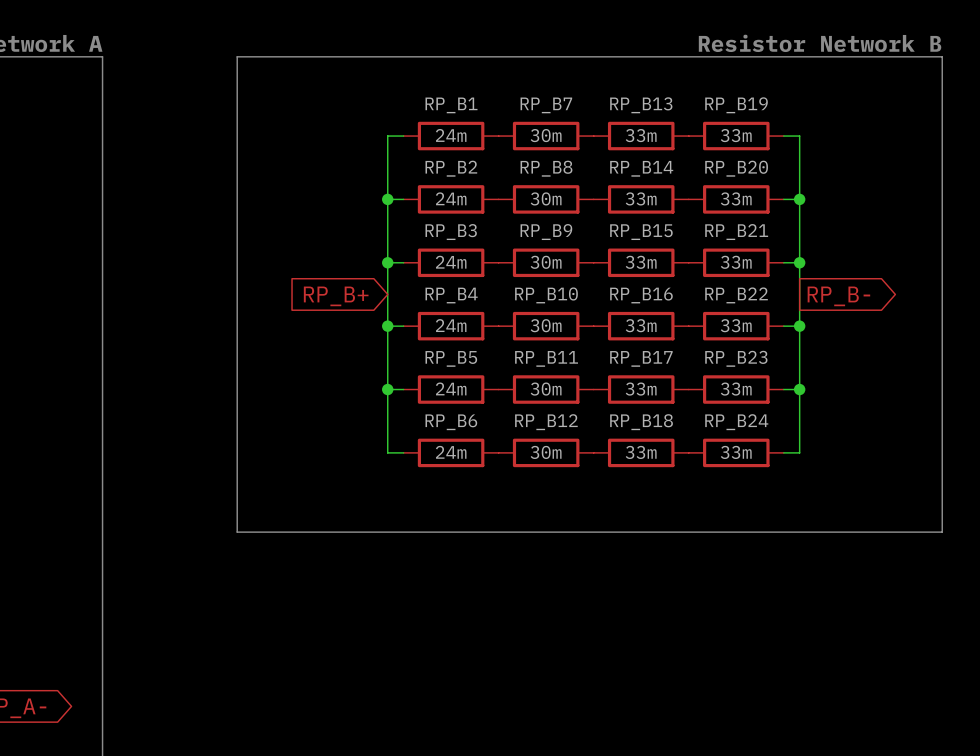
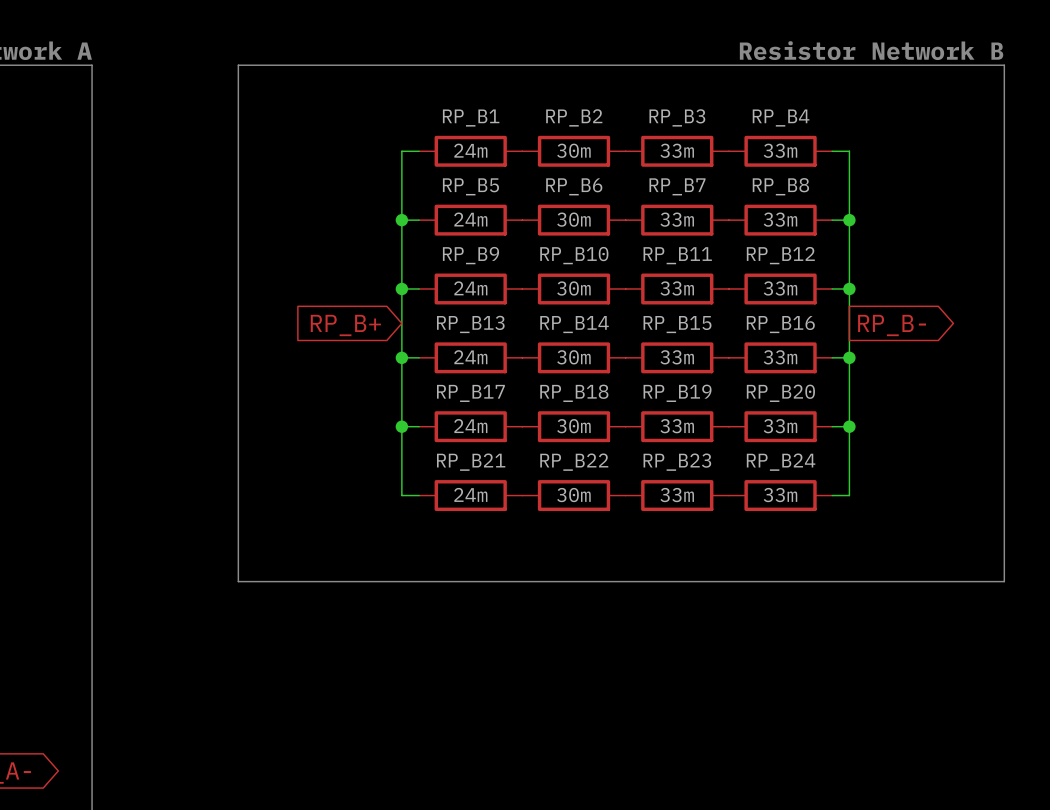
RP_B7 name: RP_B7 (546, 105) -> RP_B2 (574, 117)
RP_B13 name: RP_B13 (641, 105) -> RP_B3 (677, 117)
RP_B19 name: RP_B19 (736, 105) -> RP_B4 (781, 118)
RP_B2 name: RP_B2 (451, 168) -> RP_B5 (470, 186)
RP_B8 name: RP_B8 (546, 168) -> RP_B6 (574, 186)
RP_B14 name: RP_B14 (641, 168) -> RP_B7 (677, 186)
RP_B20 name: RP_B20 (736, 168) -> RP_B8 (780, 186)
RP_B3 name: RP_B3 (451, 232) -> RP_B9 (470, 255)
RP_B9 name: RP_B9 (546, 232) -> RP_B10 (574, 255)
RP_B15 name: RP_B15 (641, 232) -> RP_B11 (677, 255)
RP_B21 name: RP_B21 (736, 232) -> RP_B12 (780, 255)
RP_B4 name: RP_B4 (451, 295) -> RP_B13 (470, 324)
RP_B10 name: RP_B10 (546, 295) -> RP_B14 (574, 324)
RP_B16 name: RP_B16 (641, 295) -> RP_B15 (677, 324)
RP_B22 name: RP_B22 (736, 295) -> RP_B16 (780, 324)
RP_B5 name: RP_B5 (451, 358) -> RP_B17 (470, 393)
RP_B11 name: RP_B11 (546, 358) -> RP_B18 (574, 393)
RP_B17 name: RP_B17 (641, 358) -> RP_B19 (677, 393)
RP_B23 name: RP_B23 (736, 358) -> RP_B20 (780, 393)
RP_B6 name: RP_B6 (451, 422) -> RP_B21 (471, 462)
RP_B12 name: RP_B12 (546, 422) -> RP_B22 (574, 462)
RP_B18 name: RP_B18 (641, 422) -> RP_B23 (677, 462)

